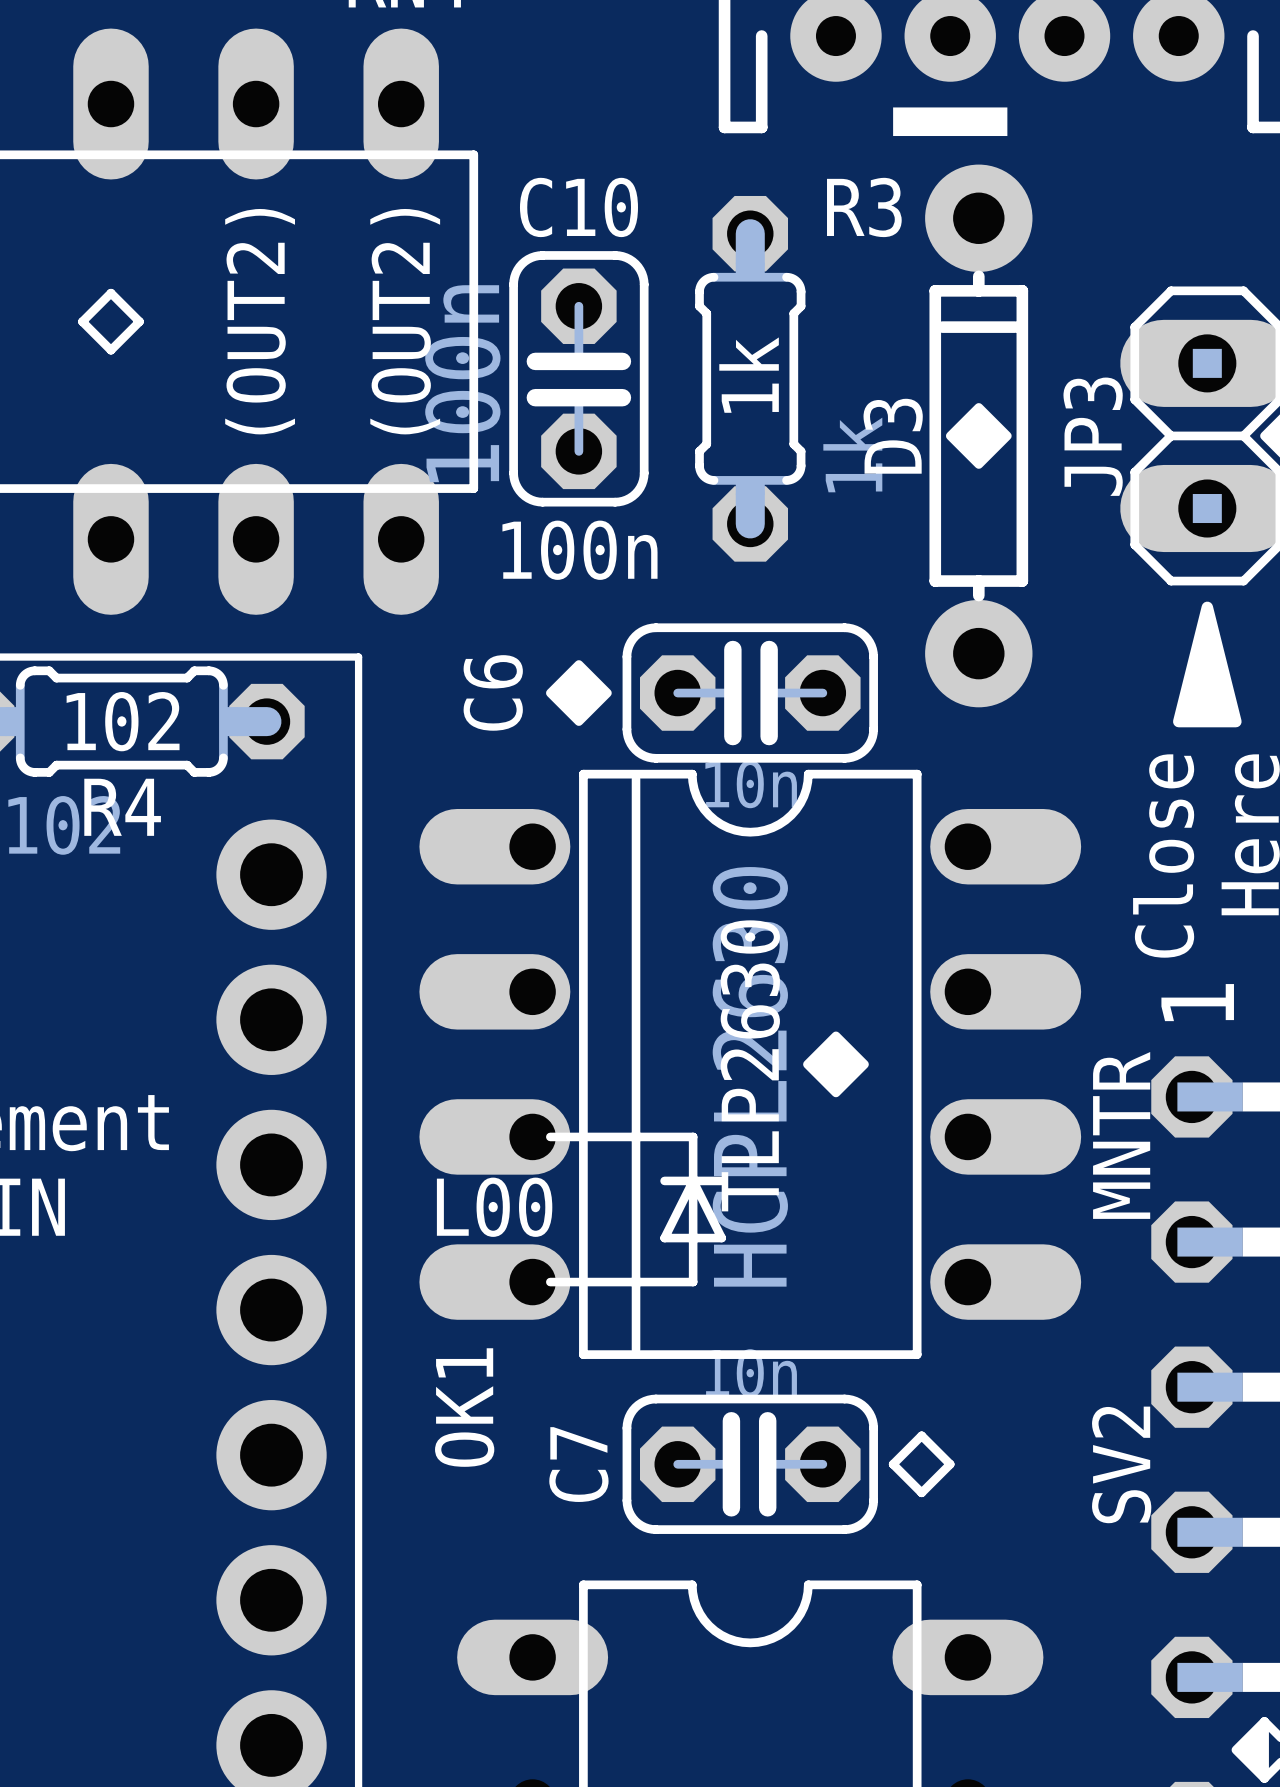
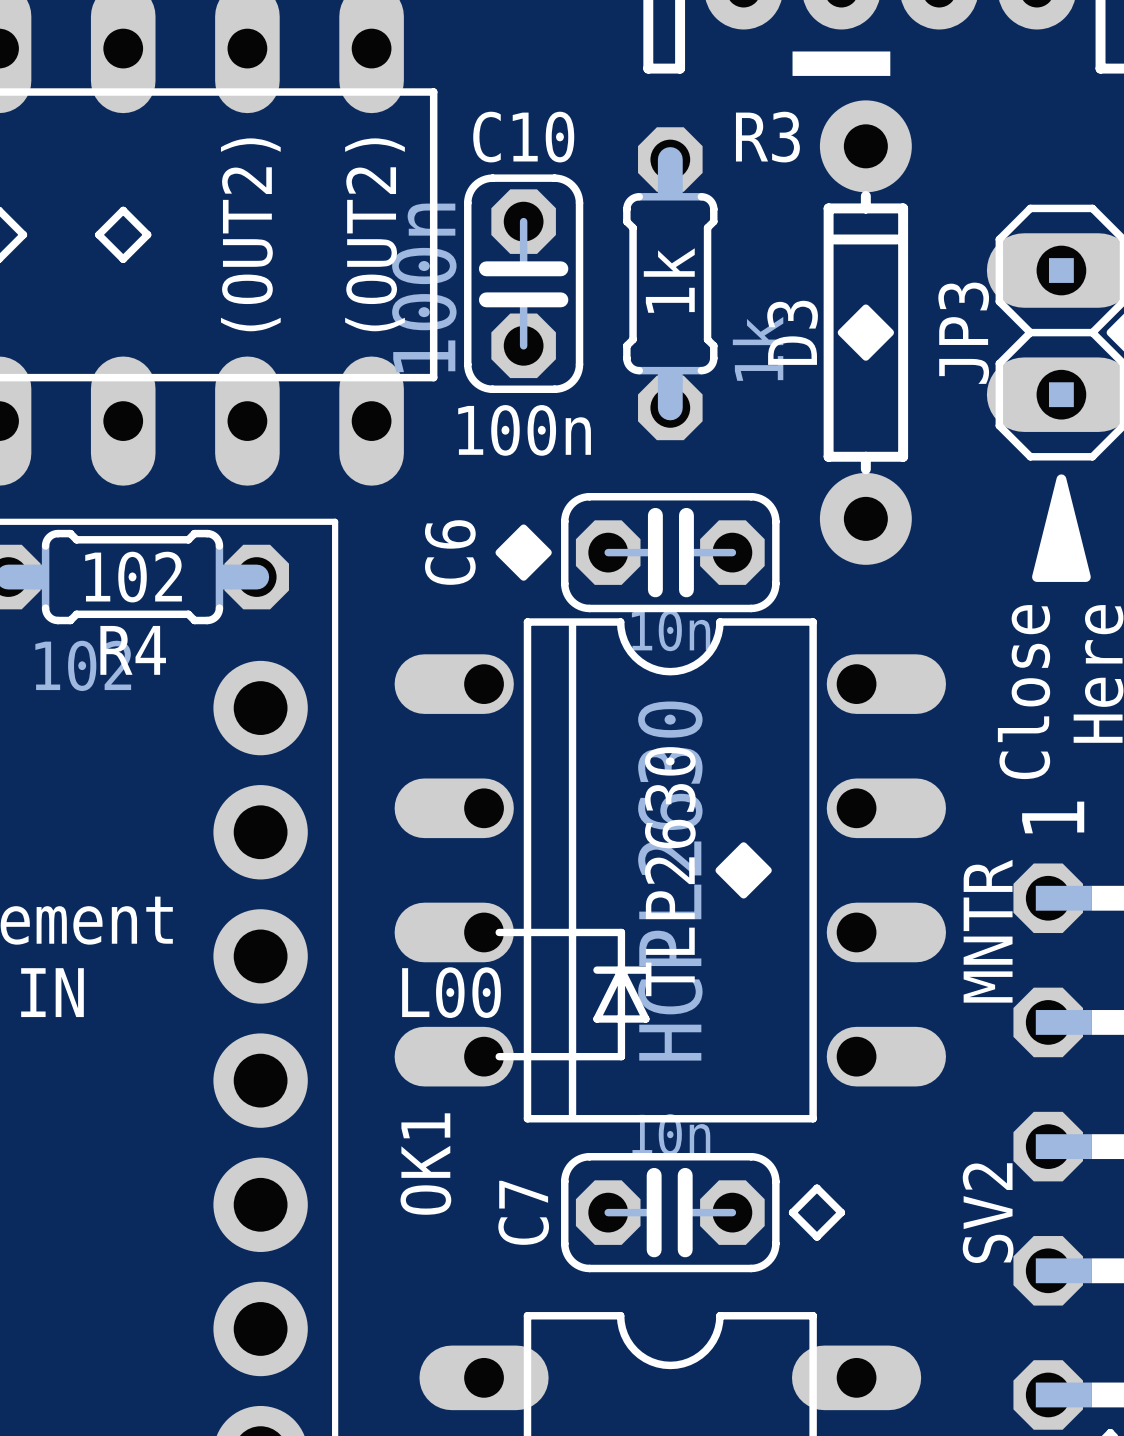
OK1 footprint: [419, 769, 1082, 1359] -> [394, 618, 946, 1123]

